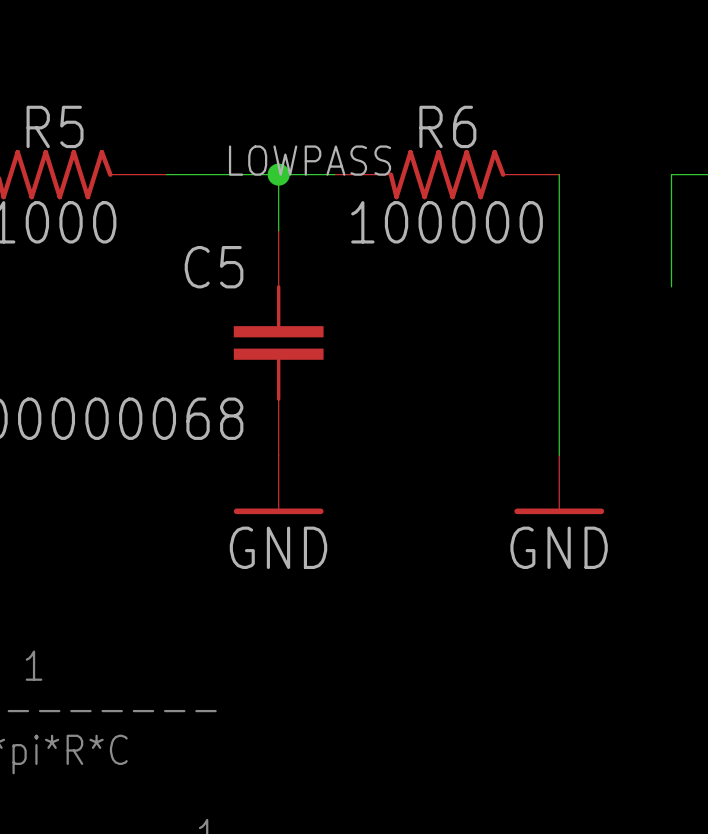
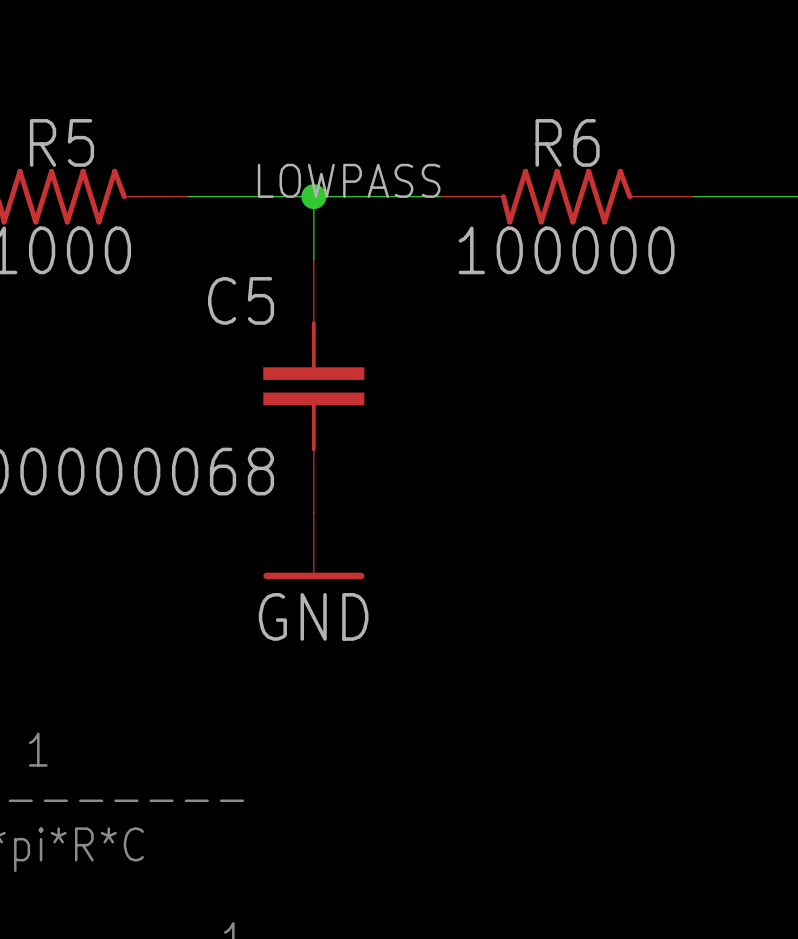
R6 position: (447, 174) -> (566, 196)
wire: (559, 174) (559, 455) -> none
wire: (671, 174) (671, 286) -> (756, 196) (693, 196)
power symbol: GND (559, 484) -> none

